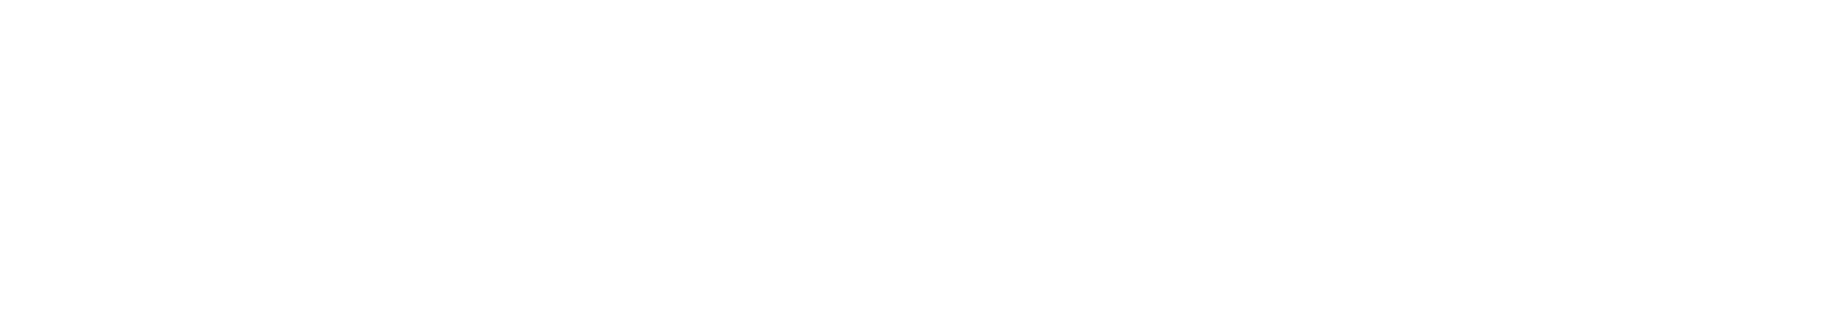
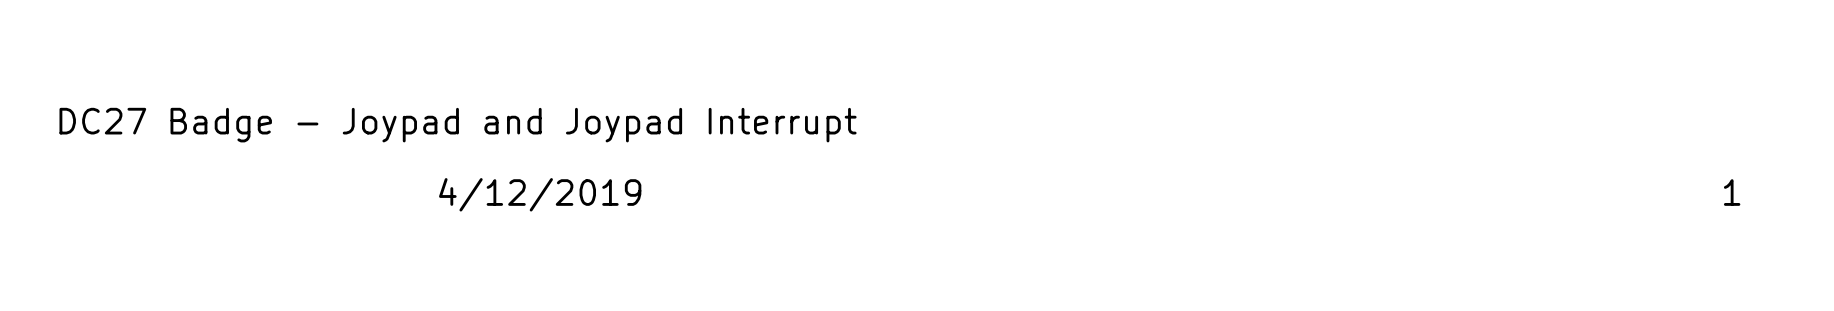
text: none -> DC27 Badge - Joypad and Joypad Interrupt (458, 125)
text: none -> 1 (1732, 192)
text: none -> 4/12/2019 (540, 194)

